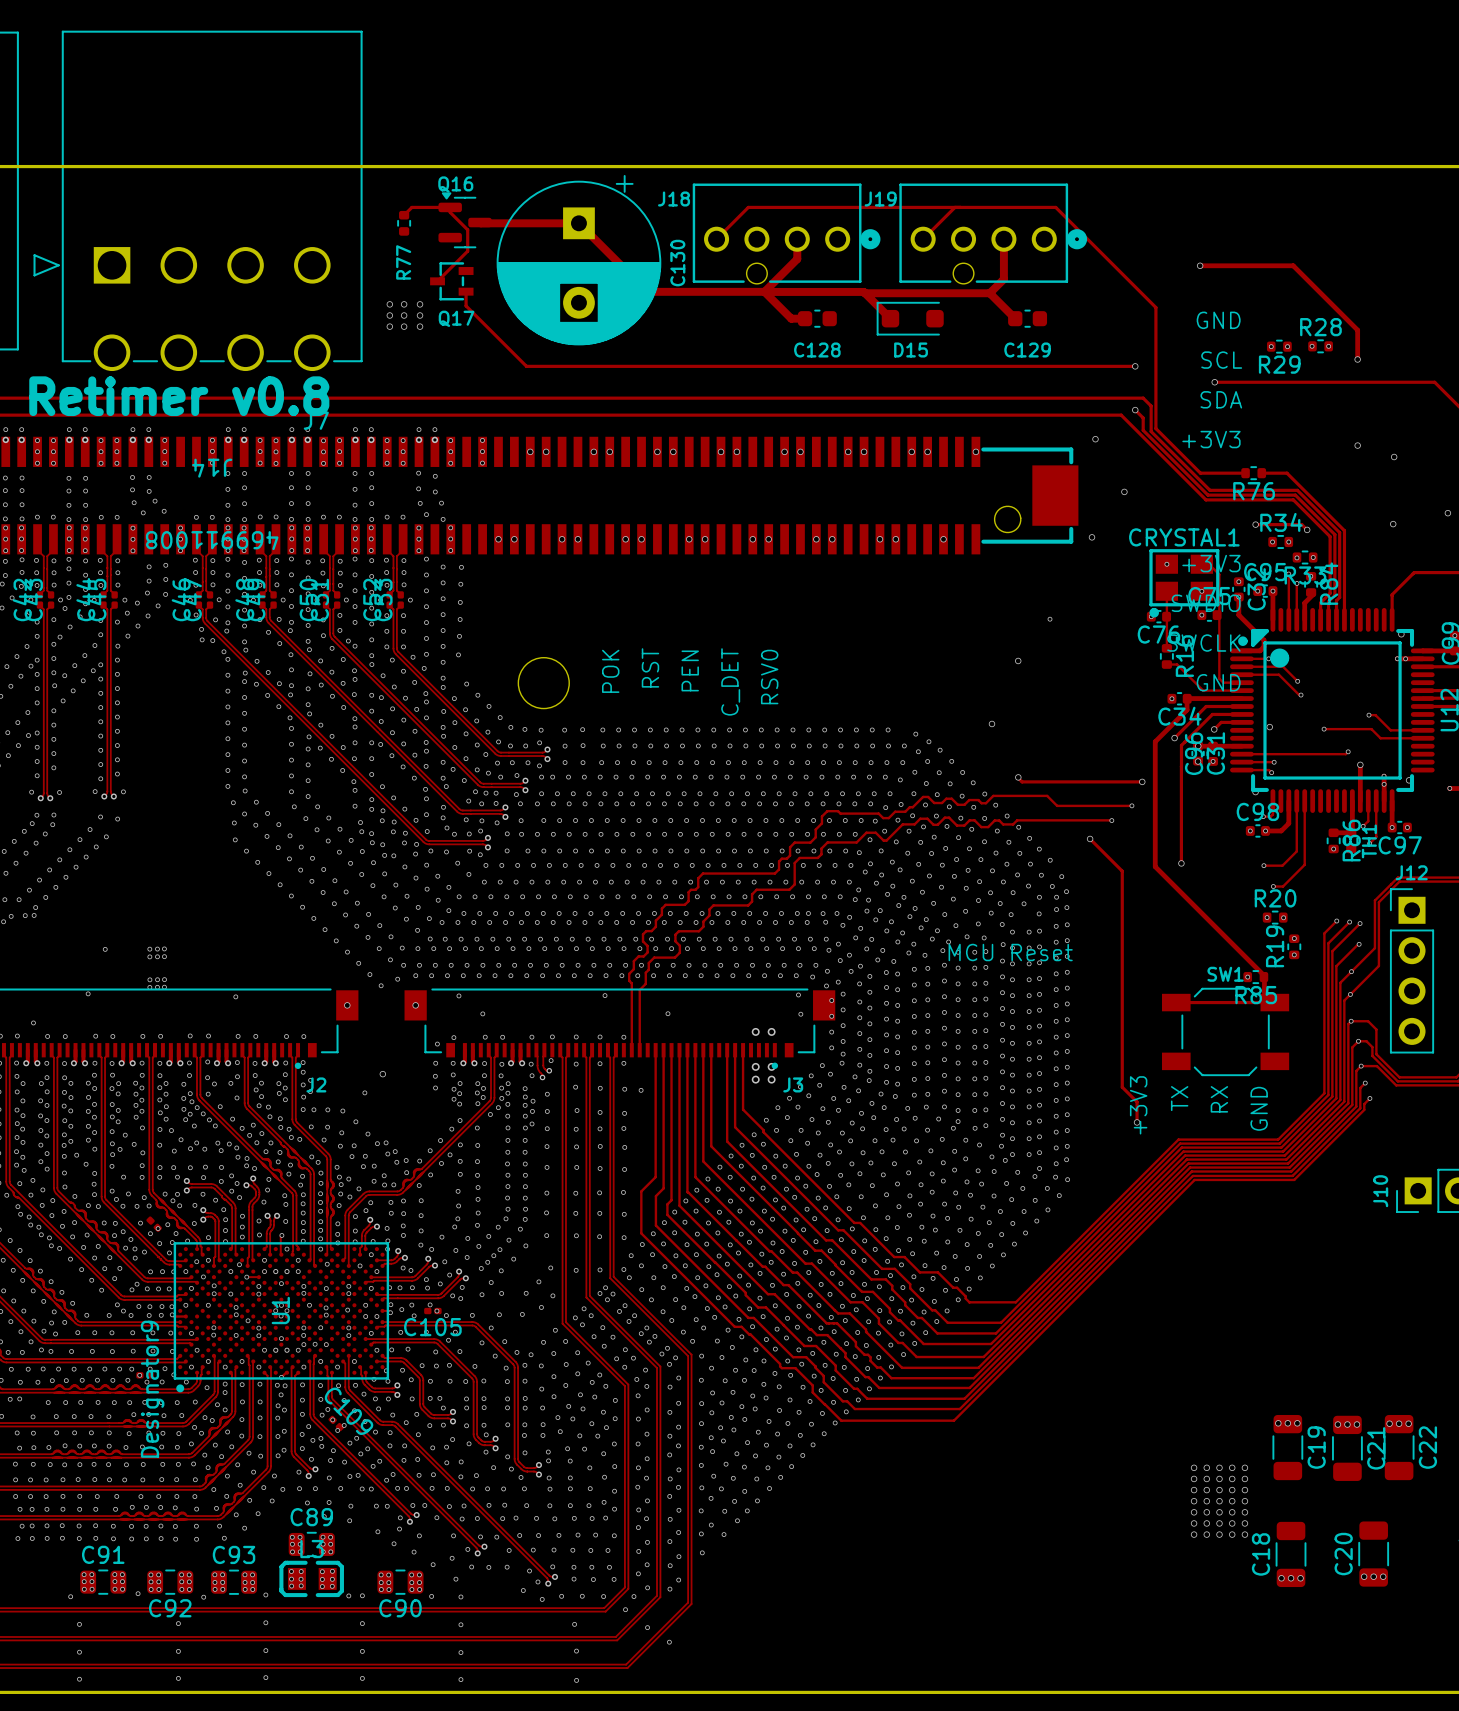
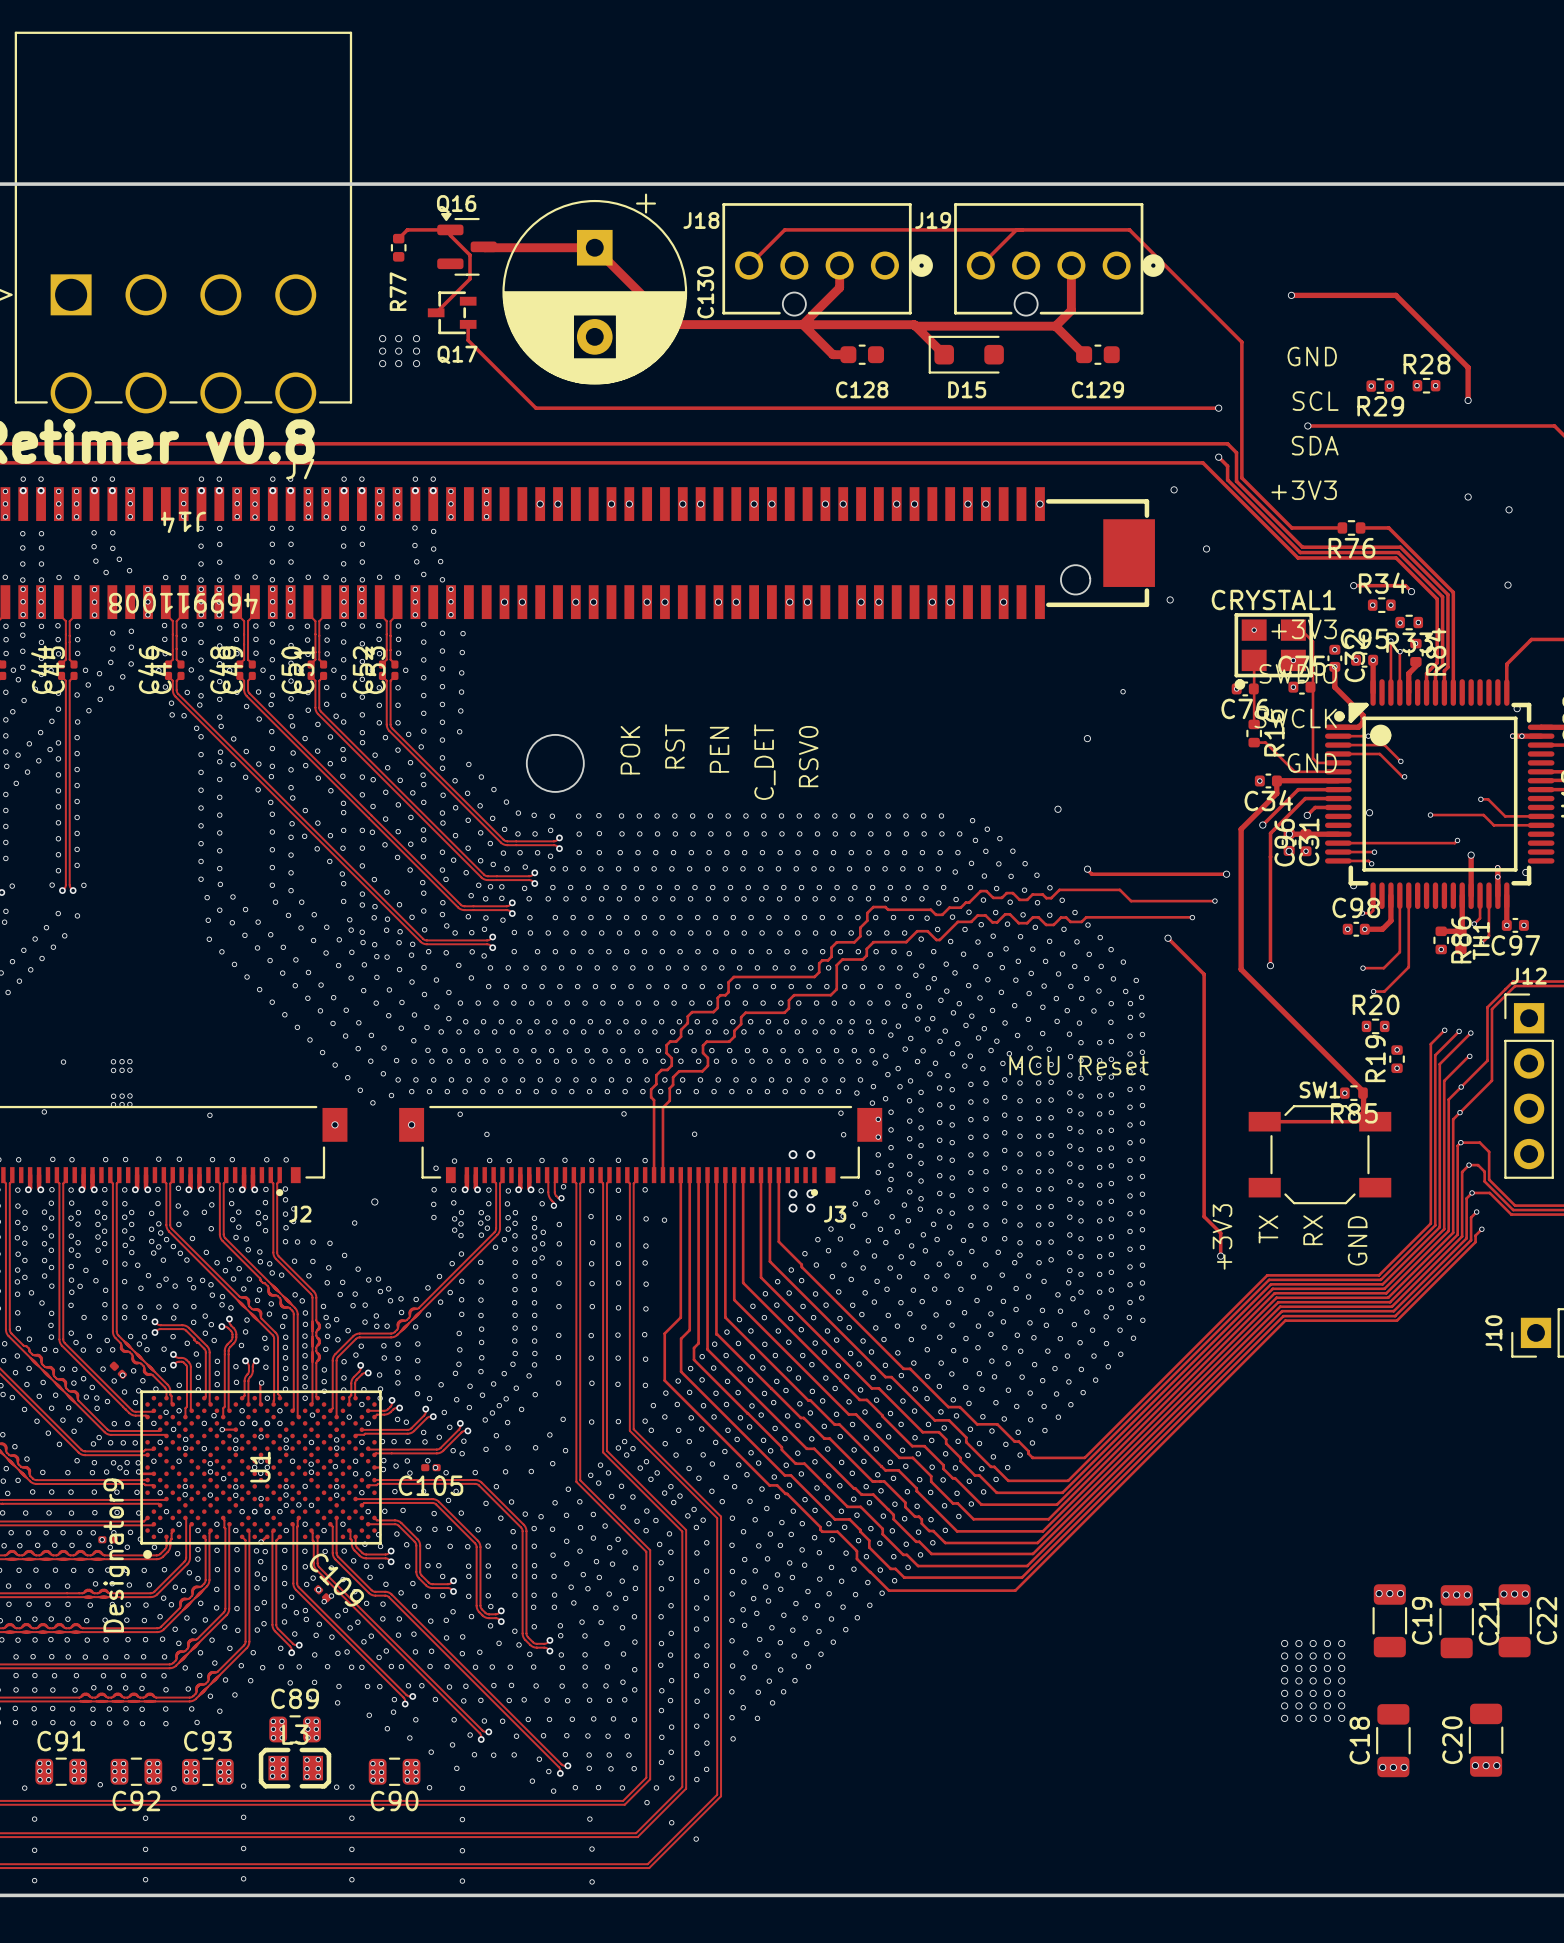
via: none -> (94, 1462)
via: (138, 1306) -> none
via: (123, 1311) -> none
via: none -> (119, 1467)
via: none -> (106, 1472)
via: (149, 1315) -> none

